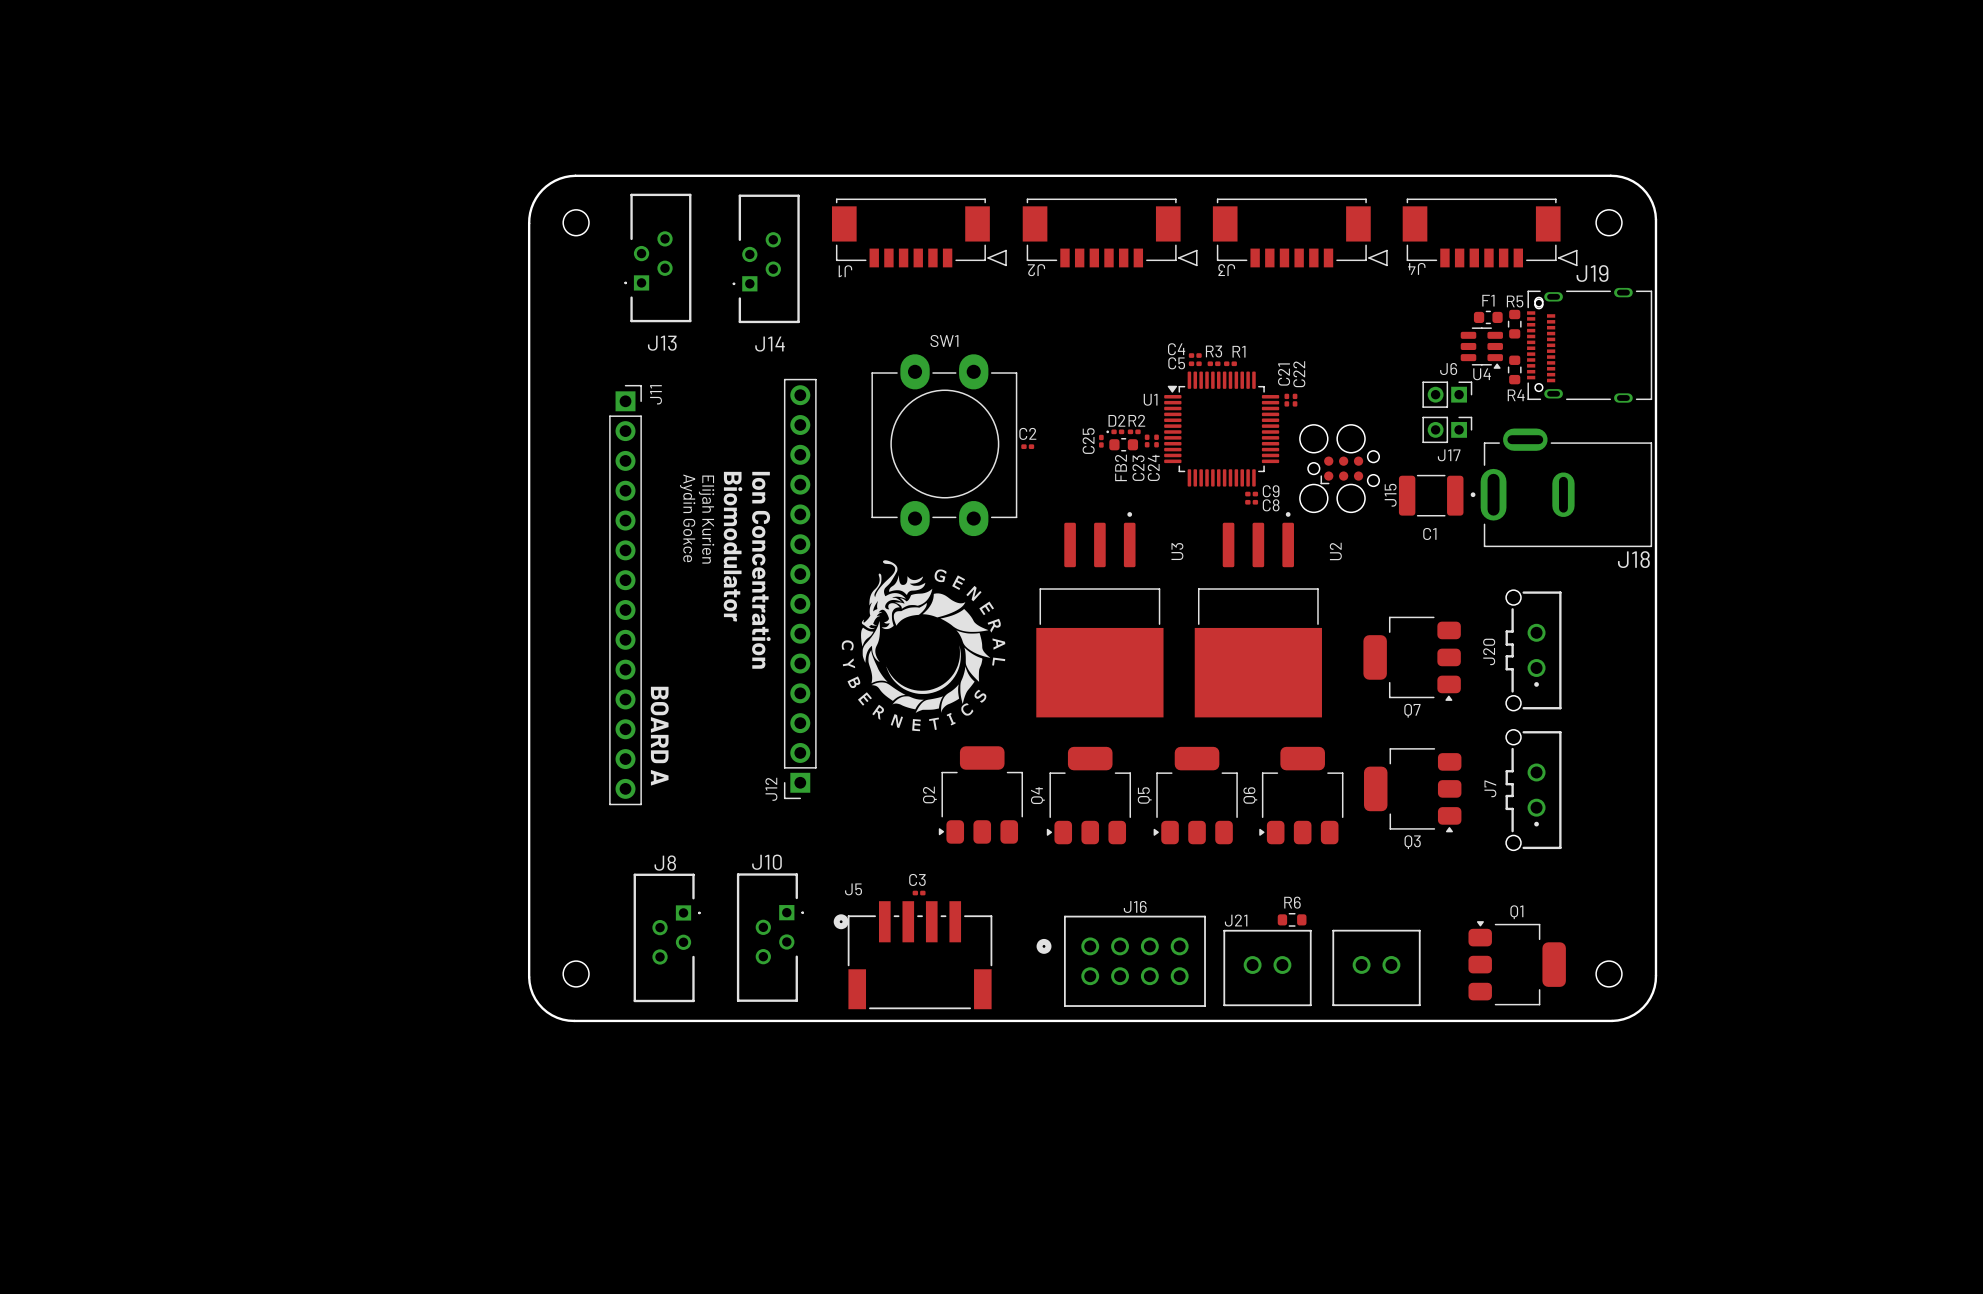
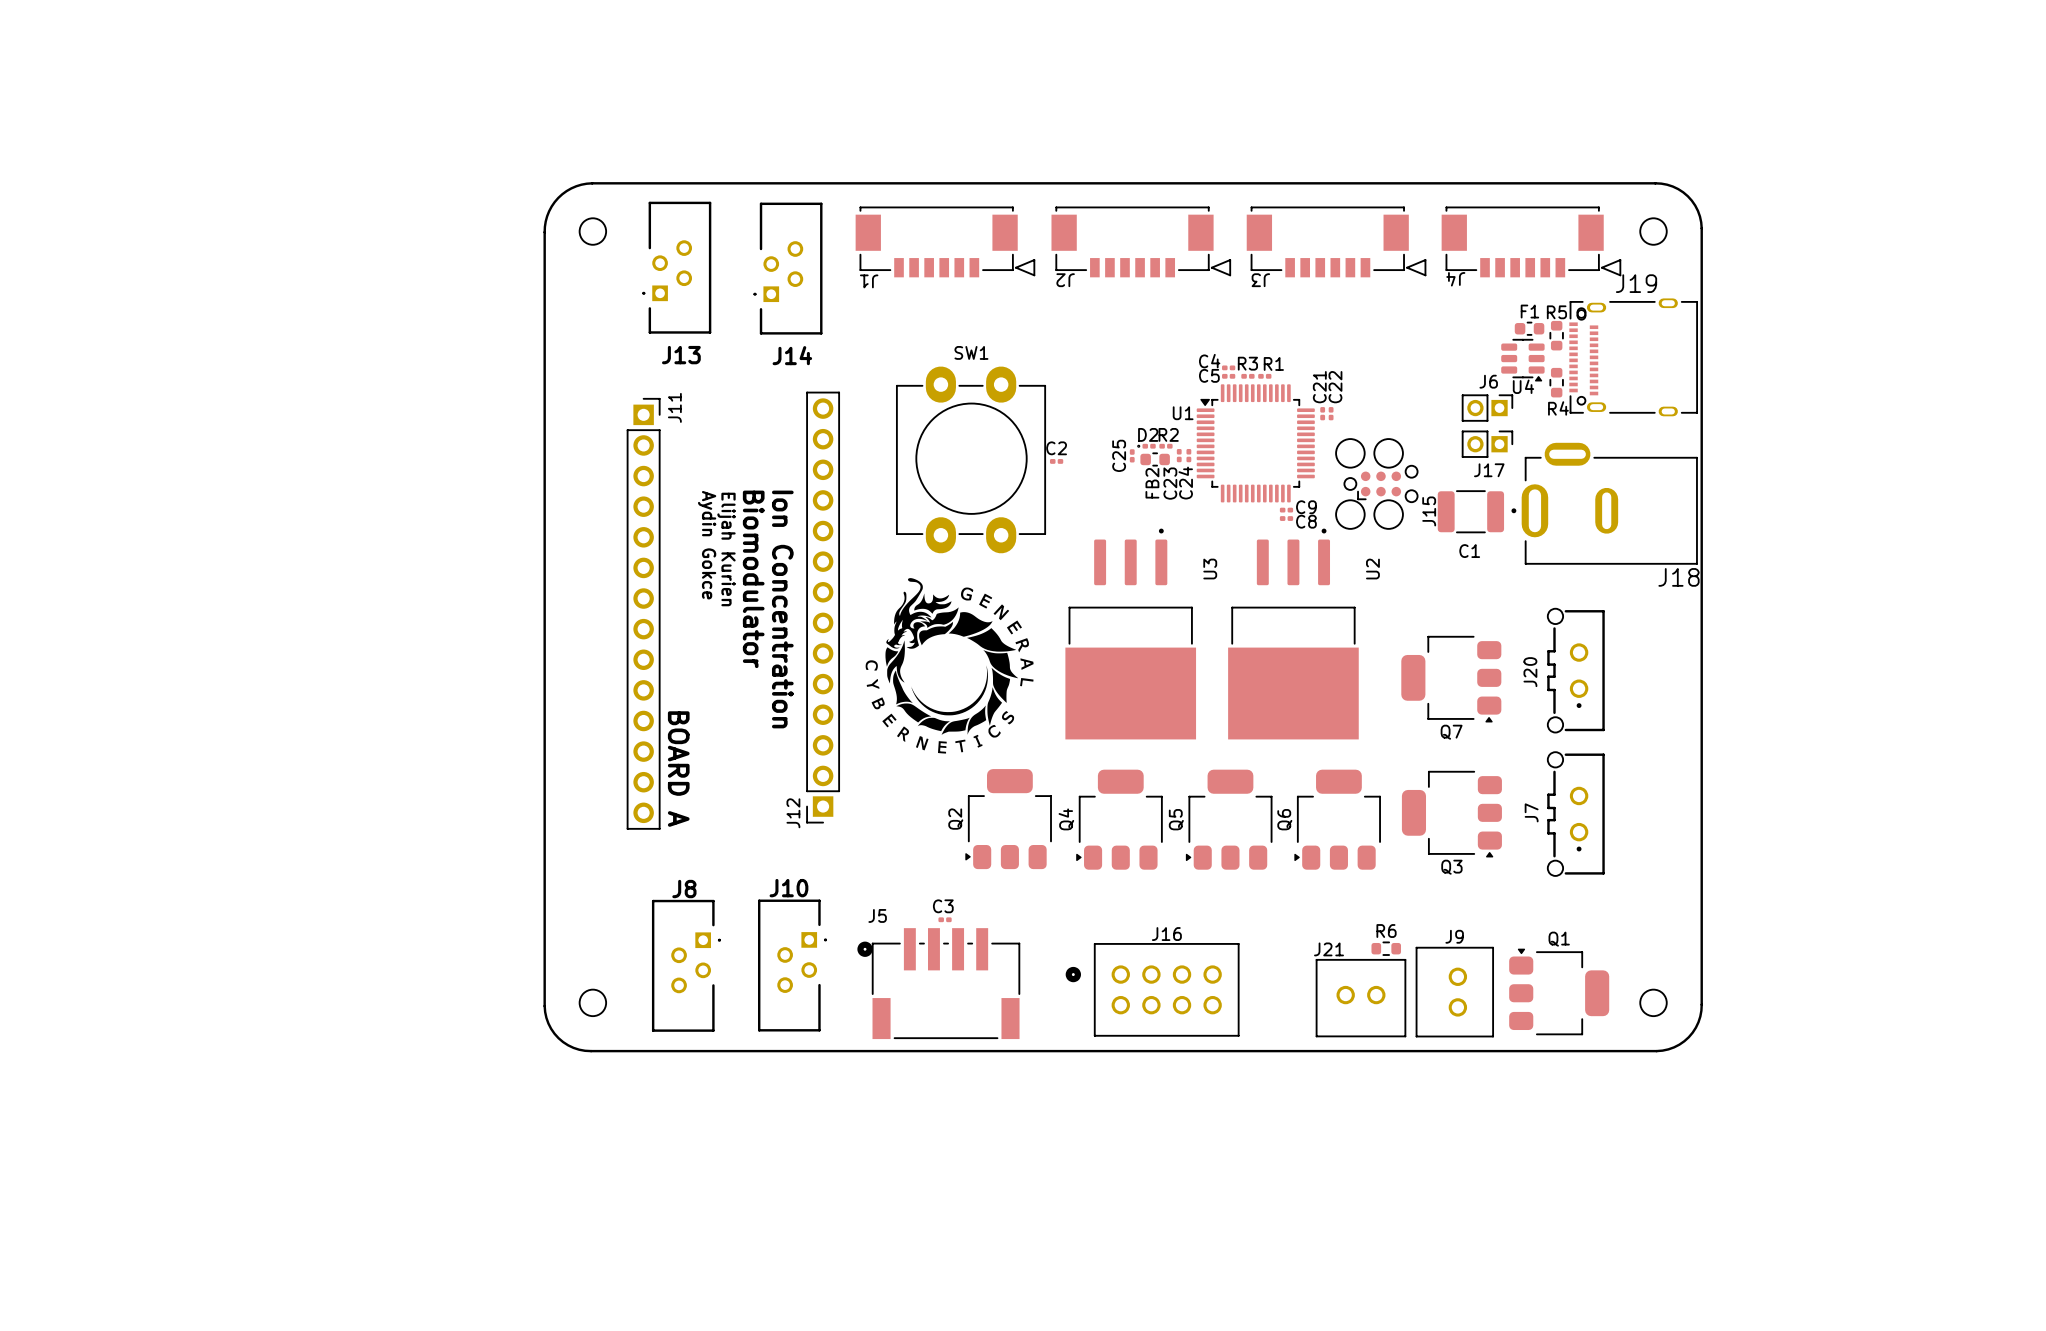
R6 position: (1292, 919) -> (1386, 948)
J9: none -> (1454, 992)
J21 position: (1267, 967) -> (1360, 998)
part: (1376, 967) -> none

